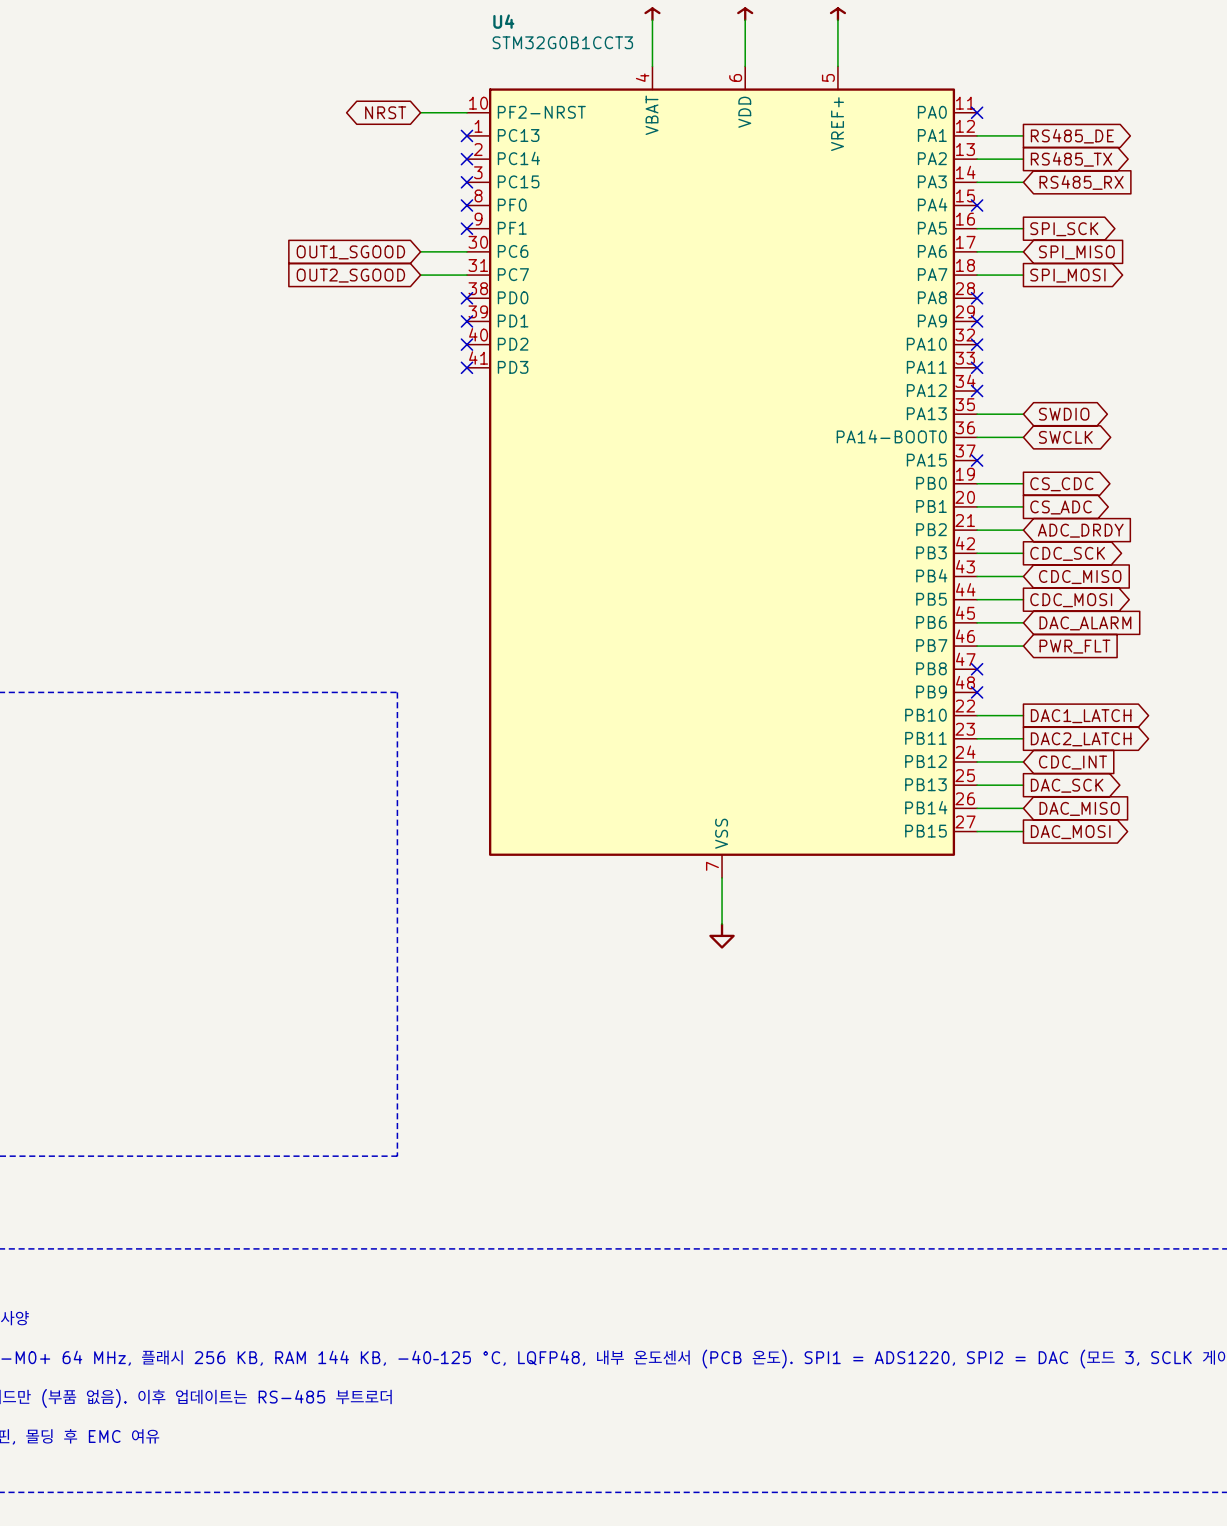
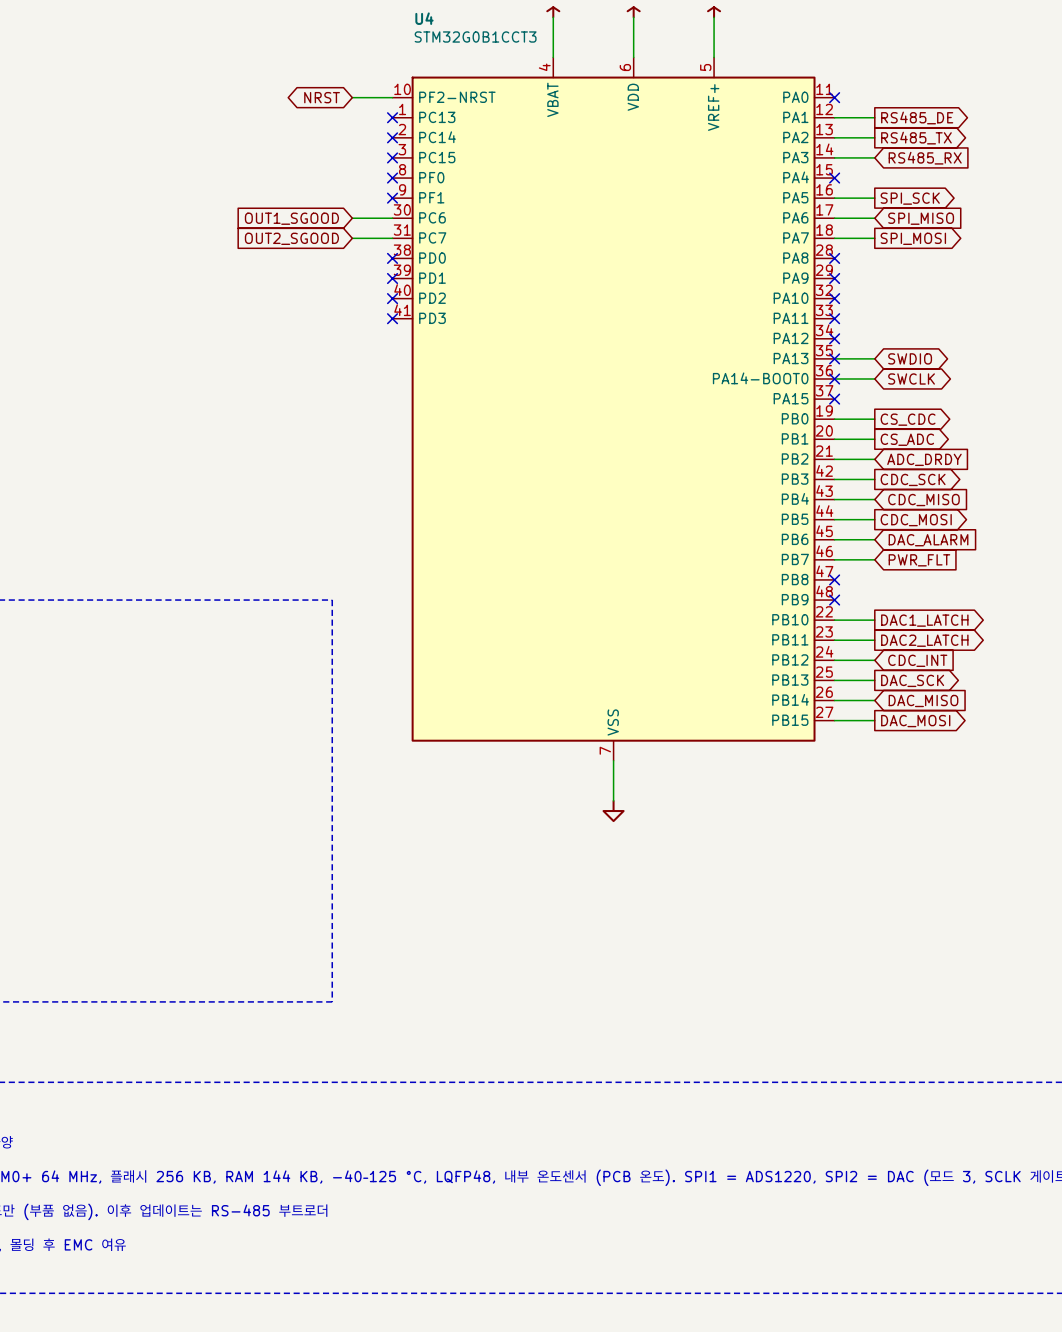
no-connect mark: none -> (834, 358)
no-connect mark: none -> (834, 378)

